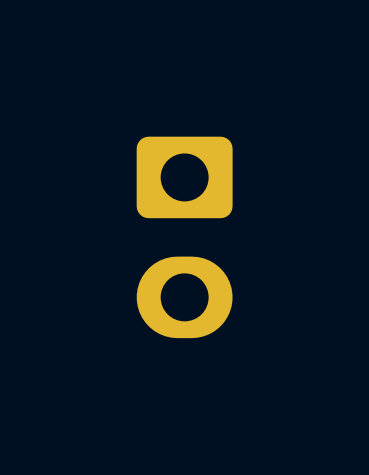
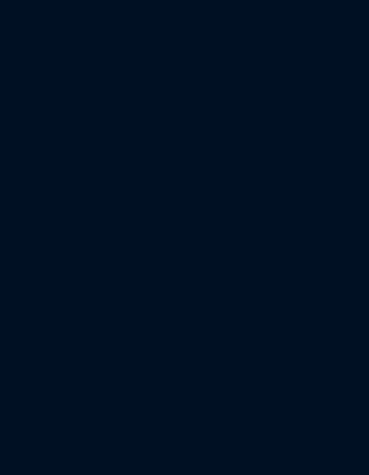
part: (184, 237) -> none

